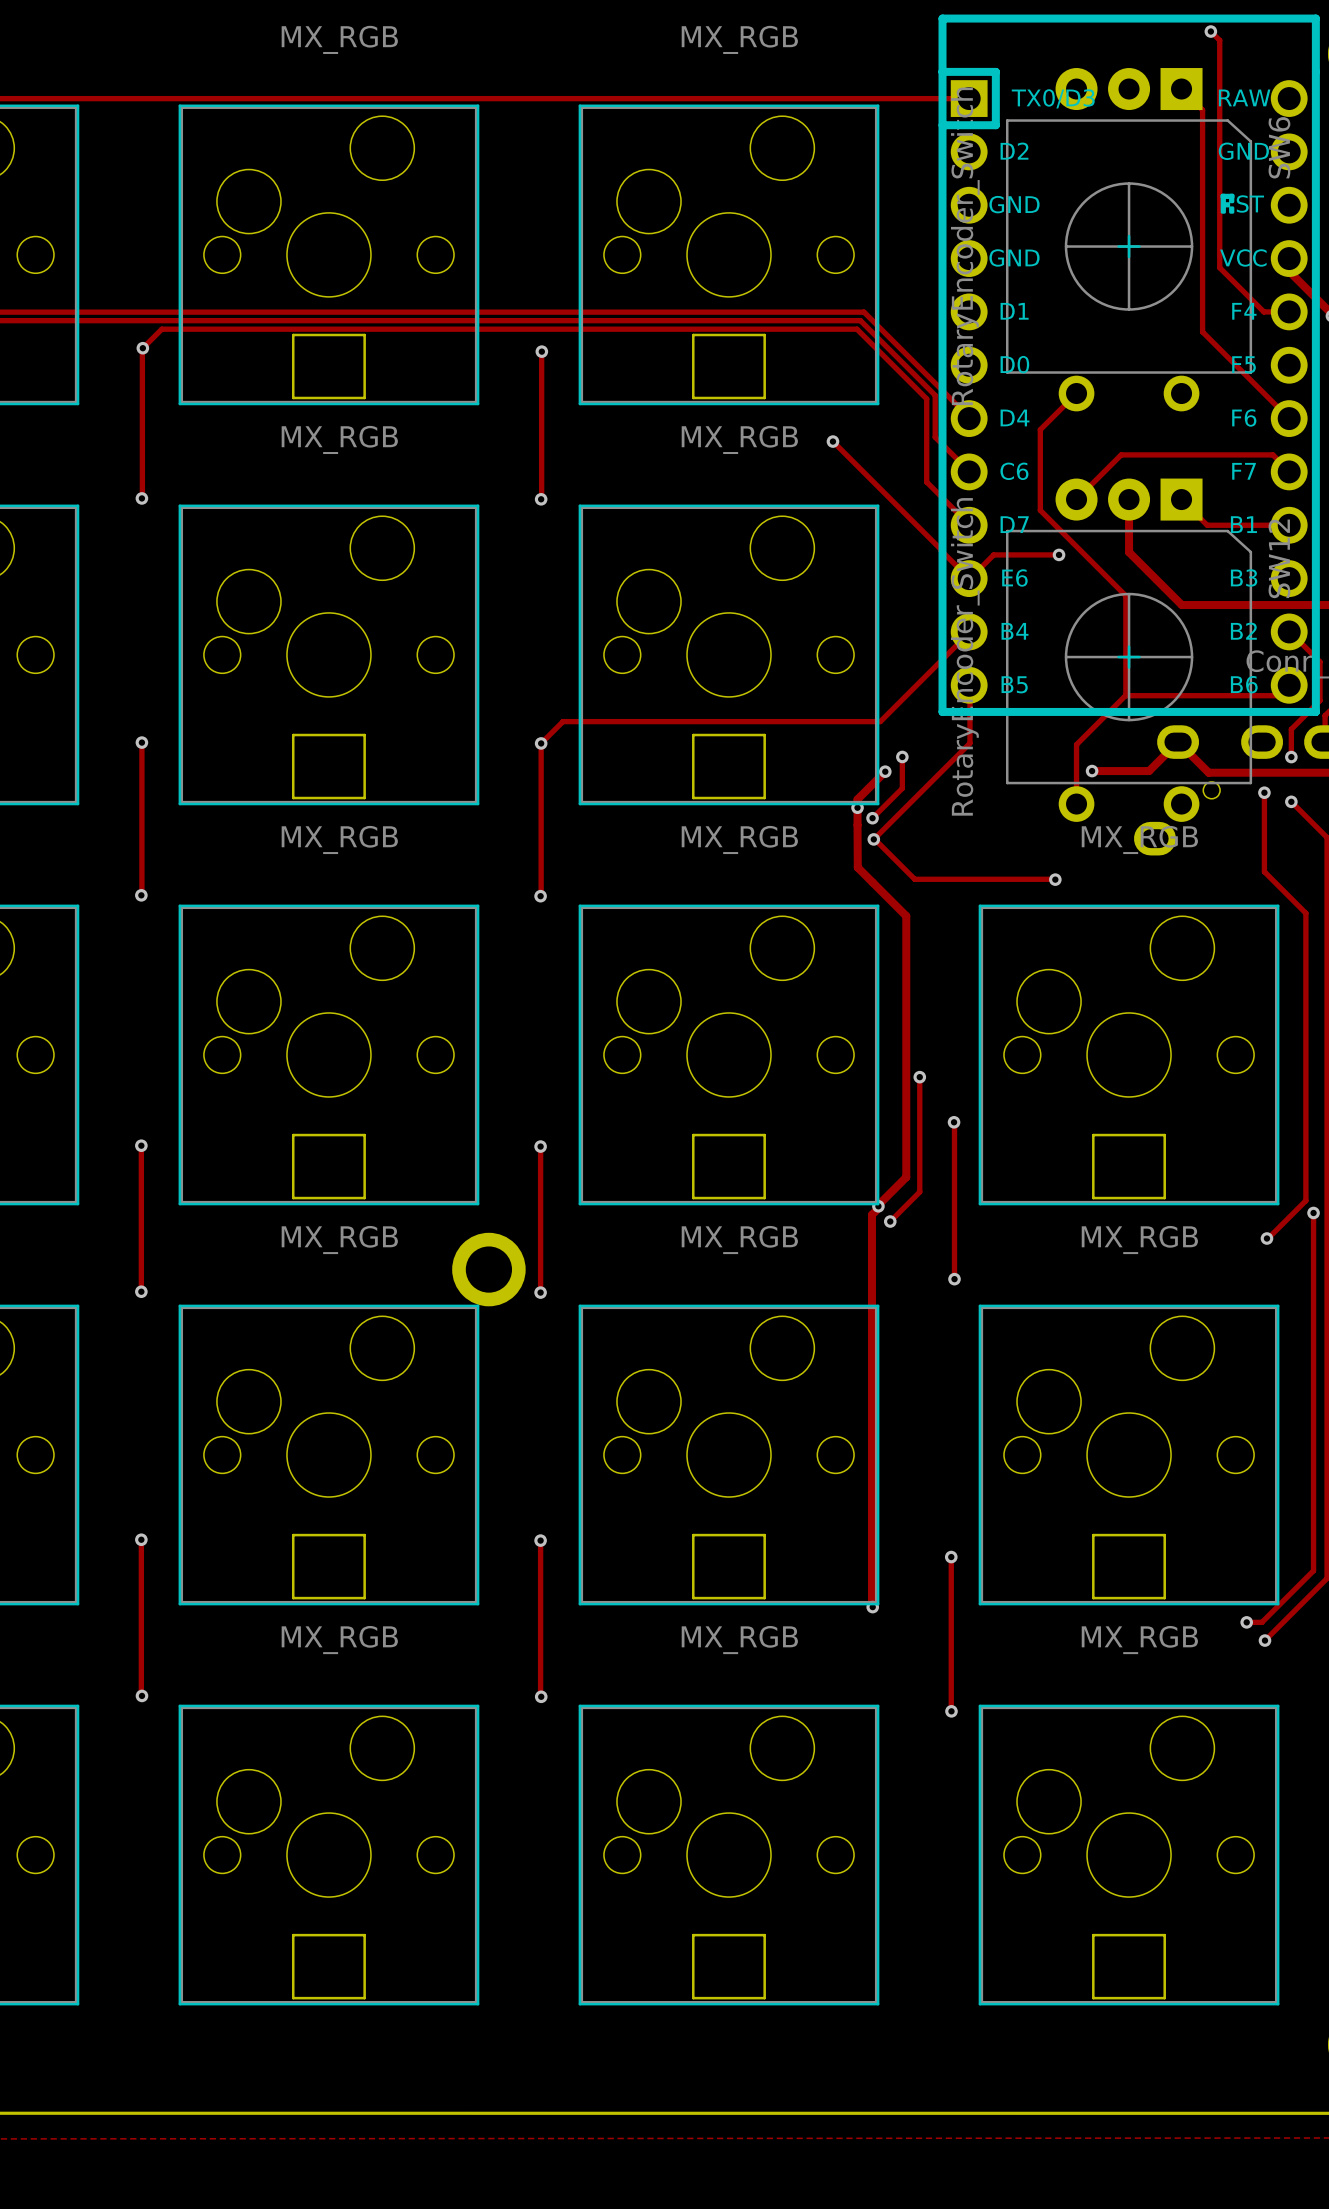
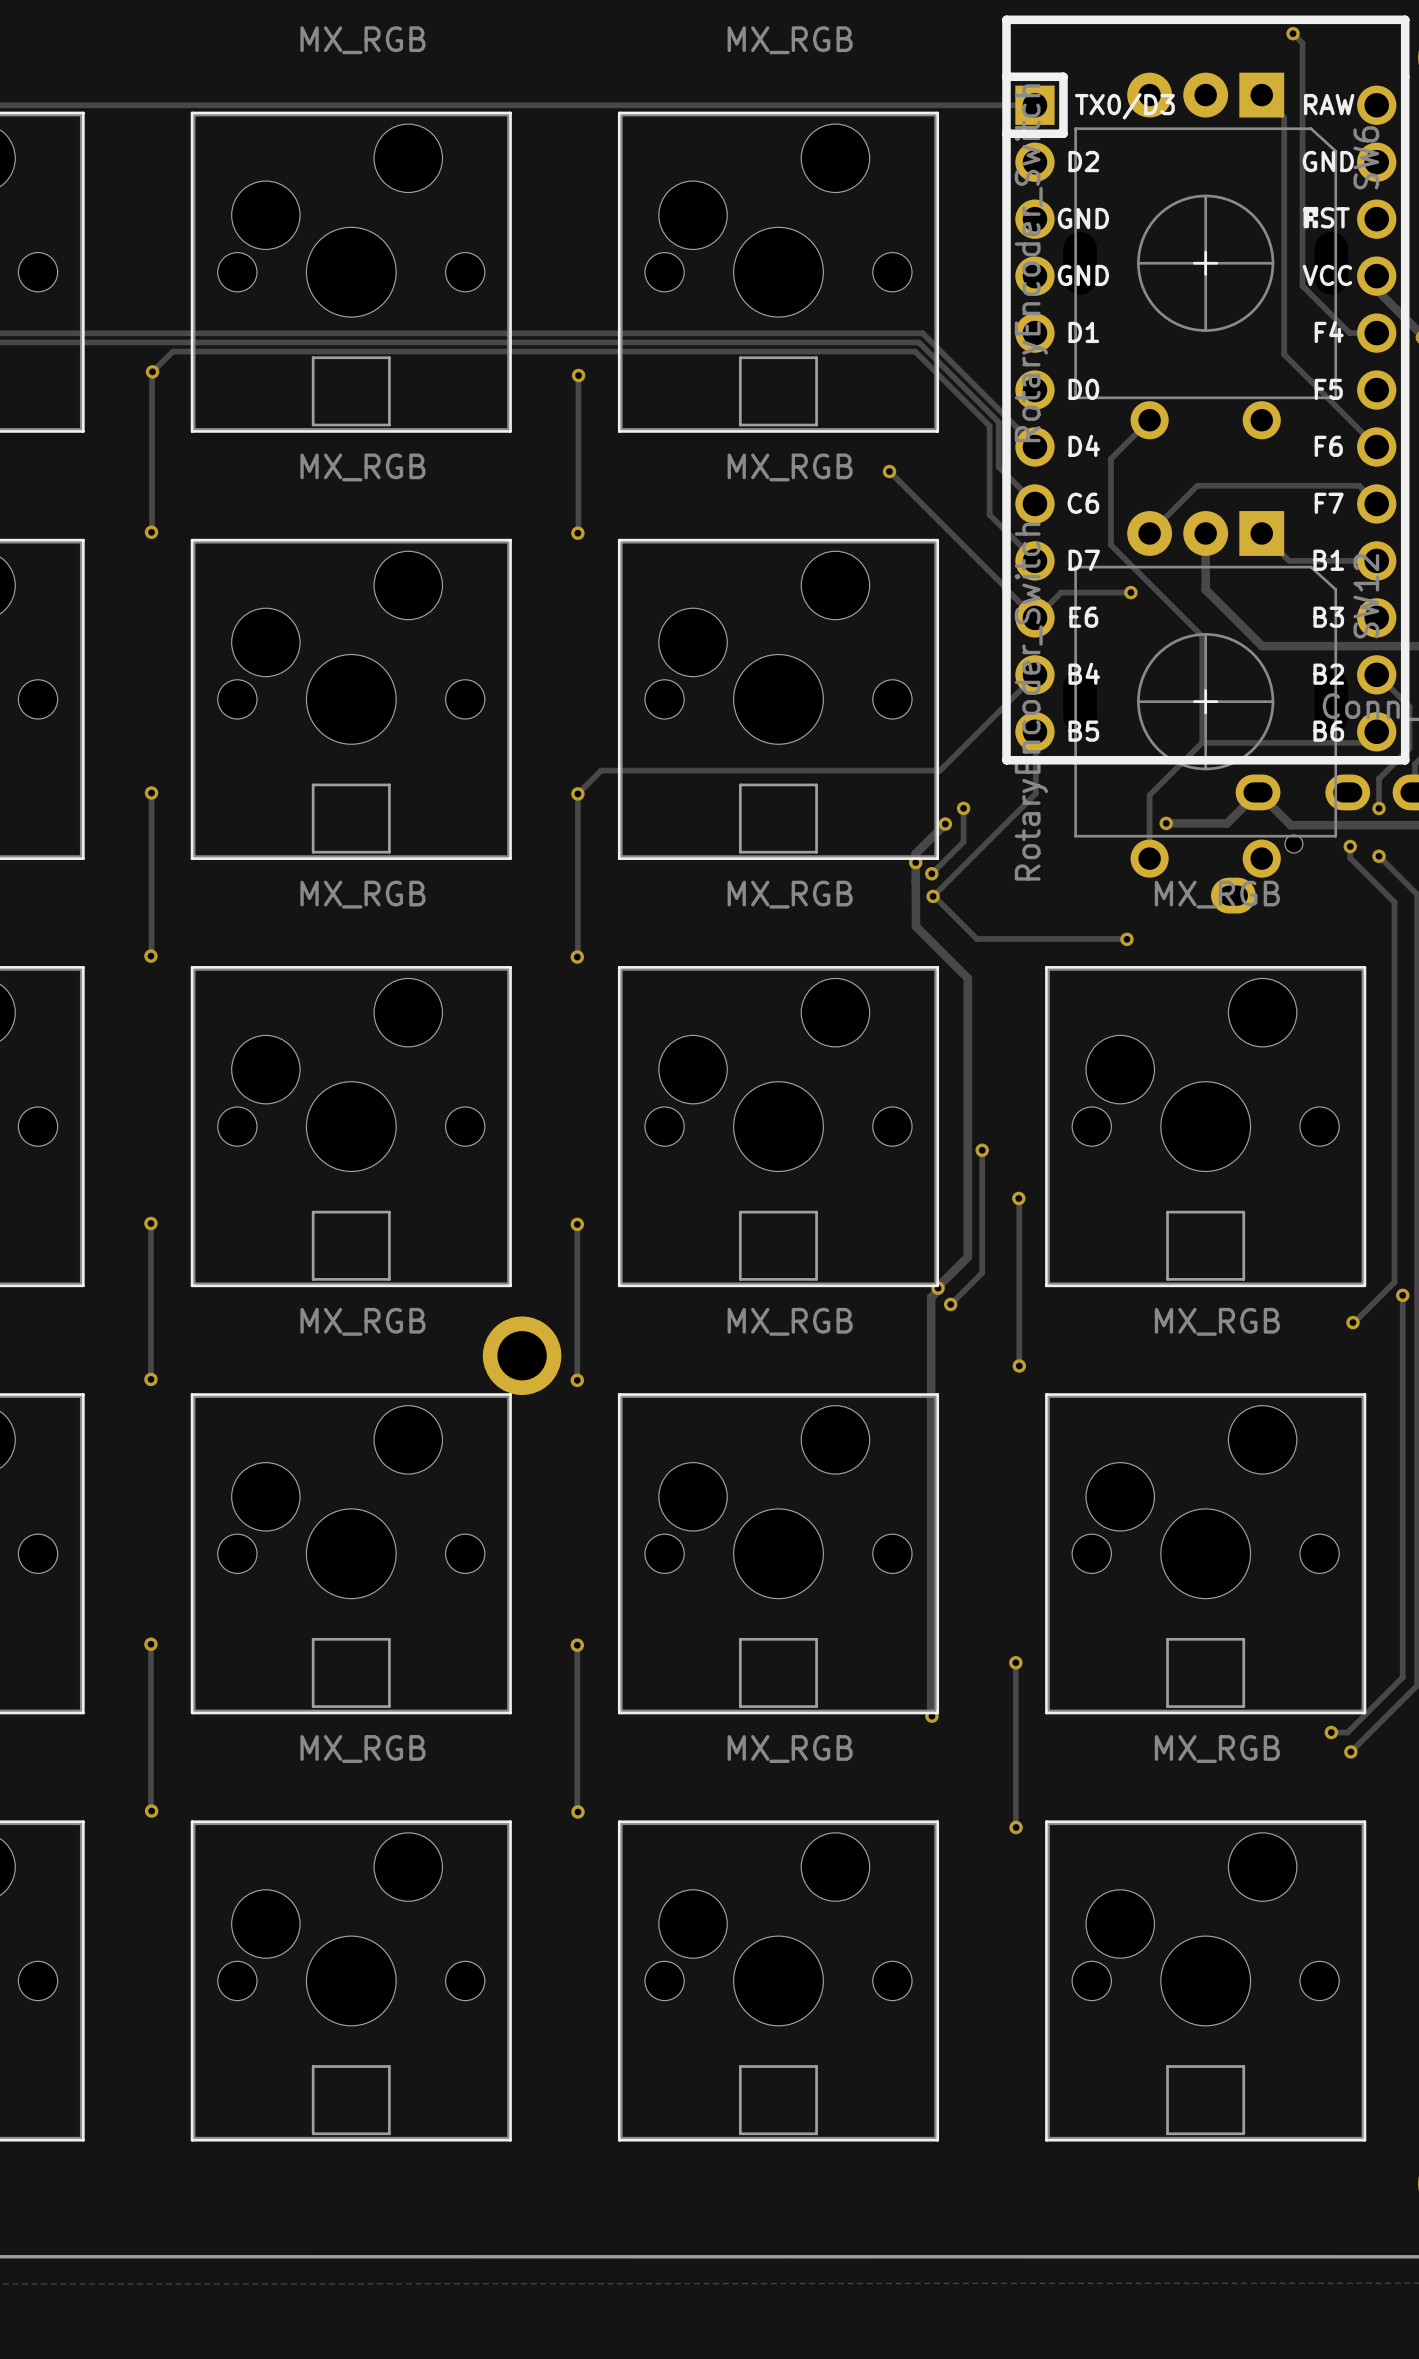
track: (1264, 803) (1264, 871) (1305, 913) -> (1350, 858) (1394, 902) (1394, 975)

